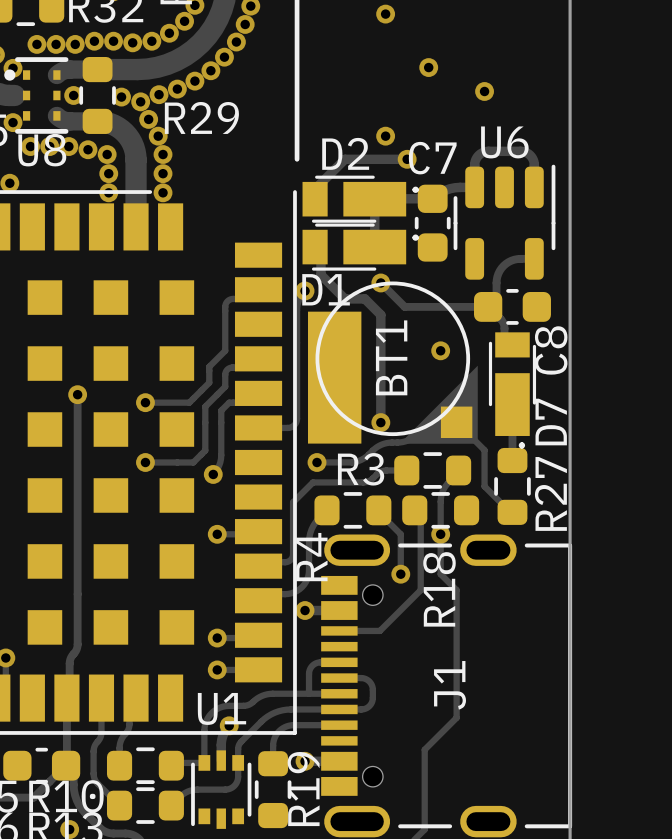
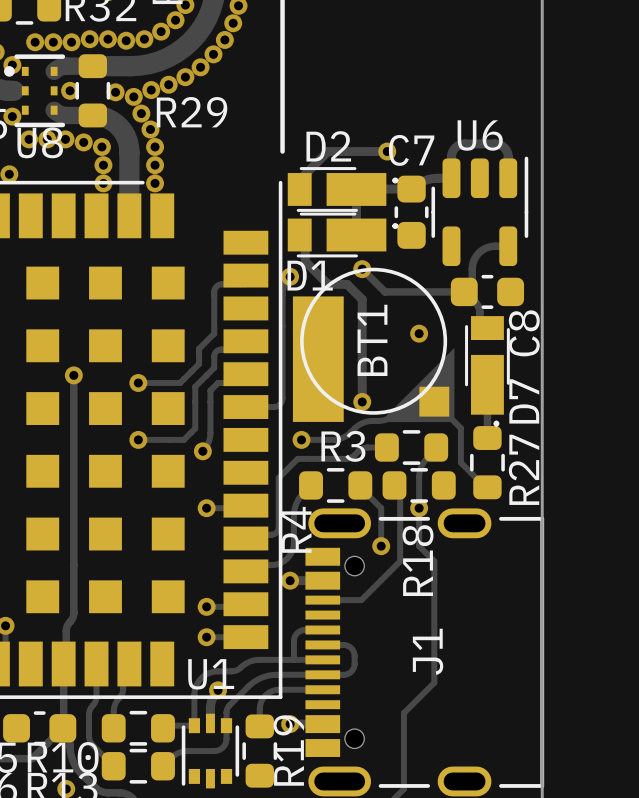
via: (385, 14) -> none
via: (428, 67) -> none
via: (484, 91) -> none
via: (385, 136) -> none

